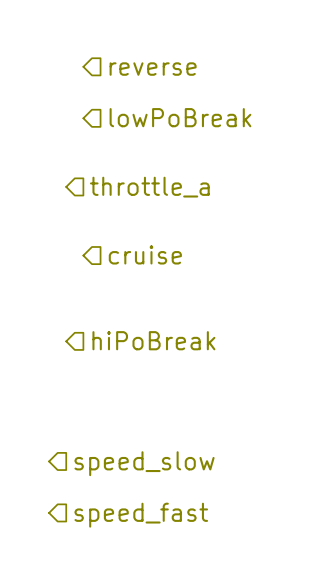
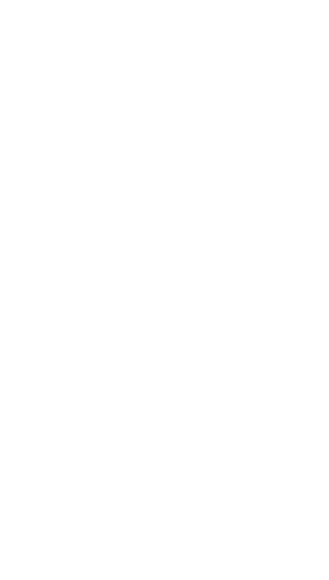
hierarchical label: reverse (153, 69) -> none
hierarchical label: lowPoBreak (180, 117) -> none
hierarchical label: throttle_a (149, 187) -> none
hierarchical label: cruise (145, 254) -> none
hierarchical label: hiPoBreak (153, 340) -> none
hierarchical label: speed_slow (144, 463) -> none
hierarchical label: speed_fast (141, 515) -> none

